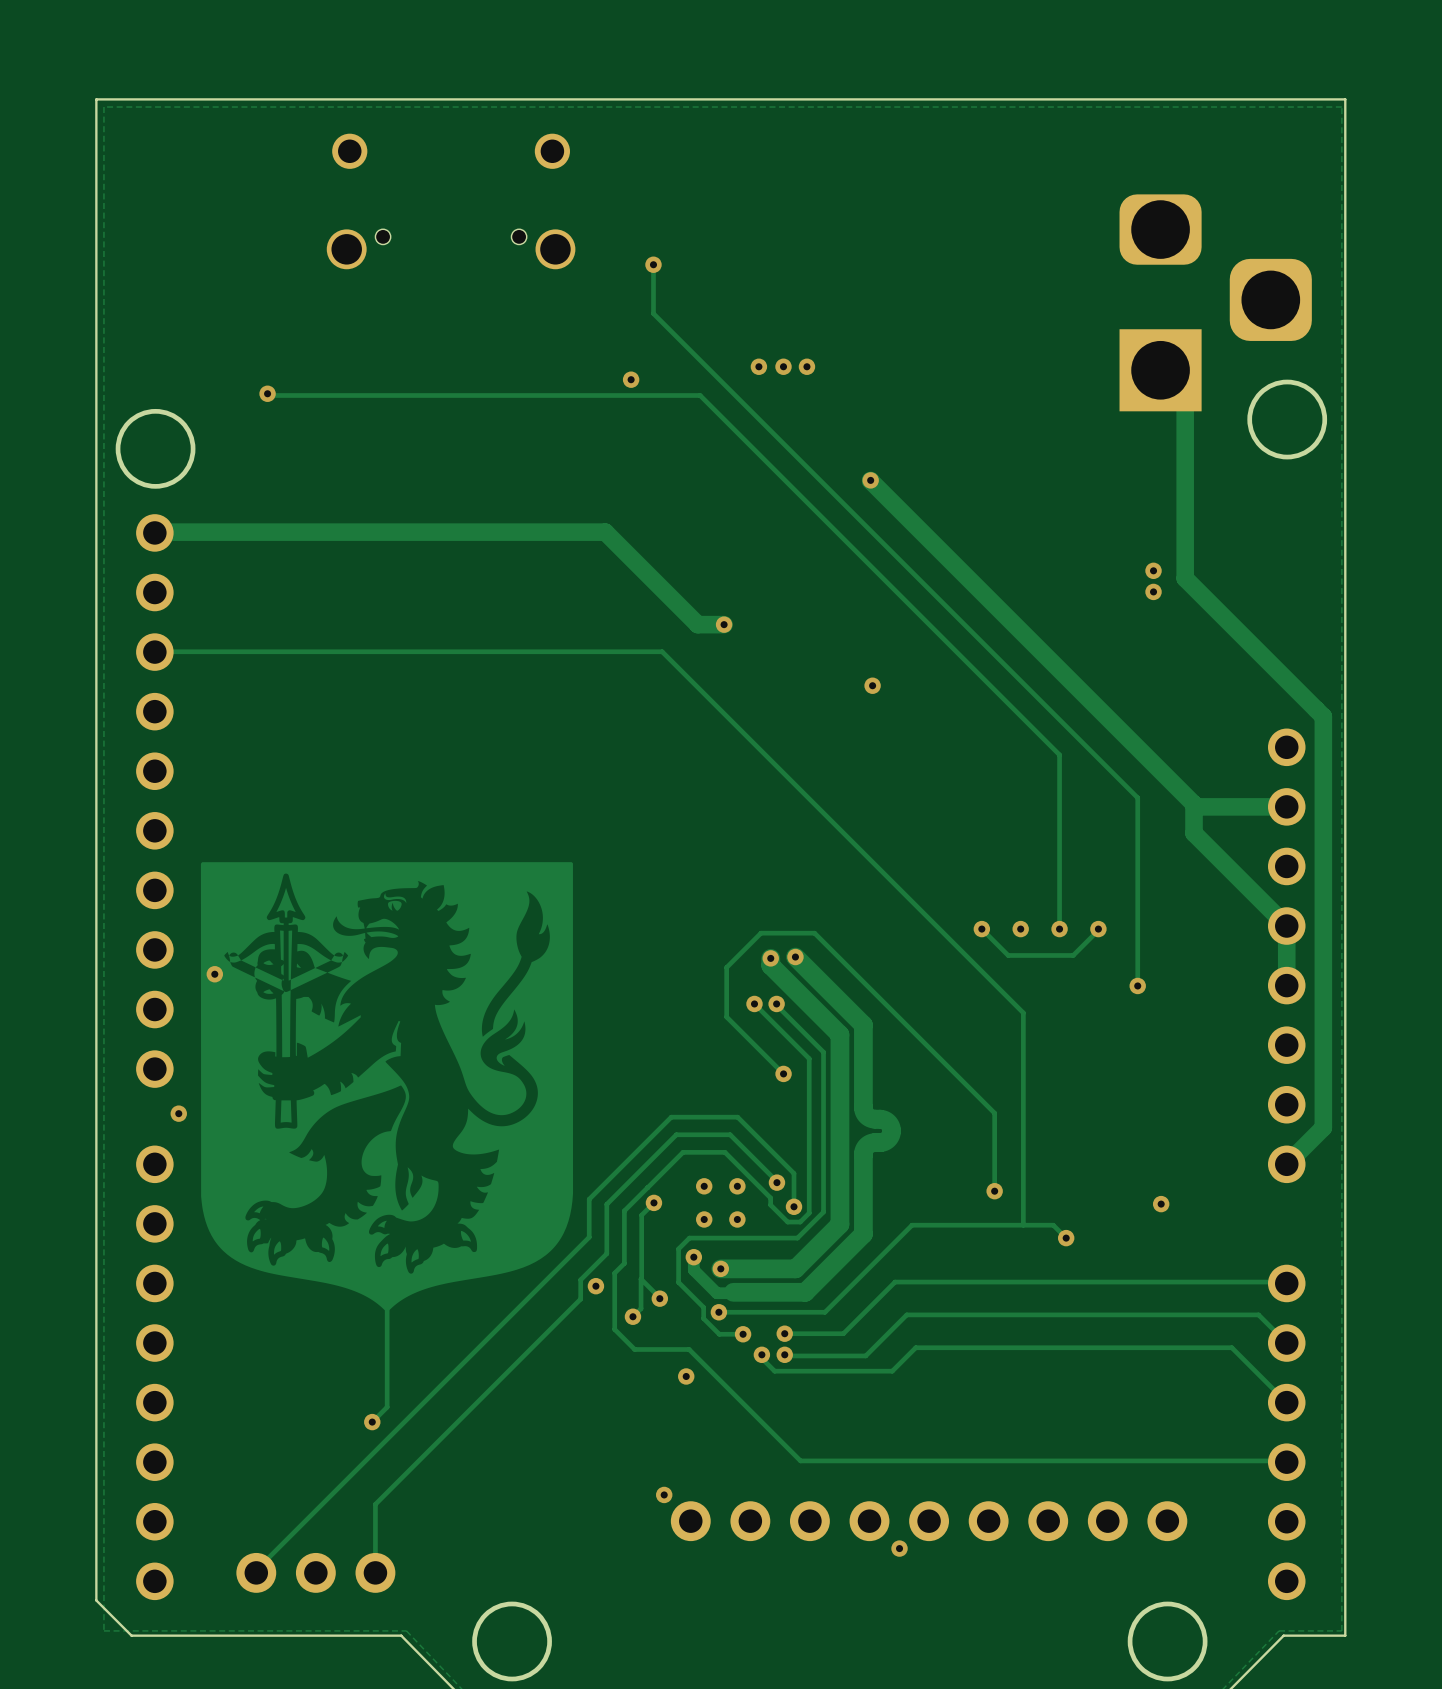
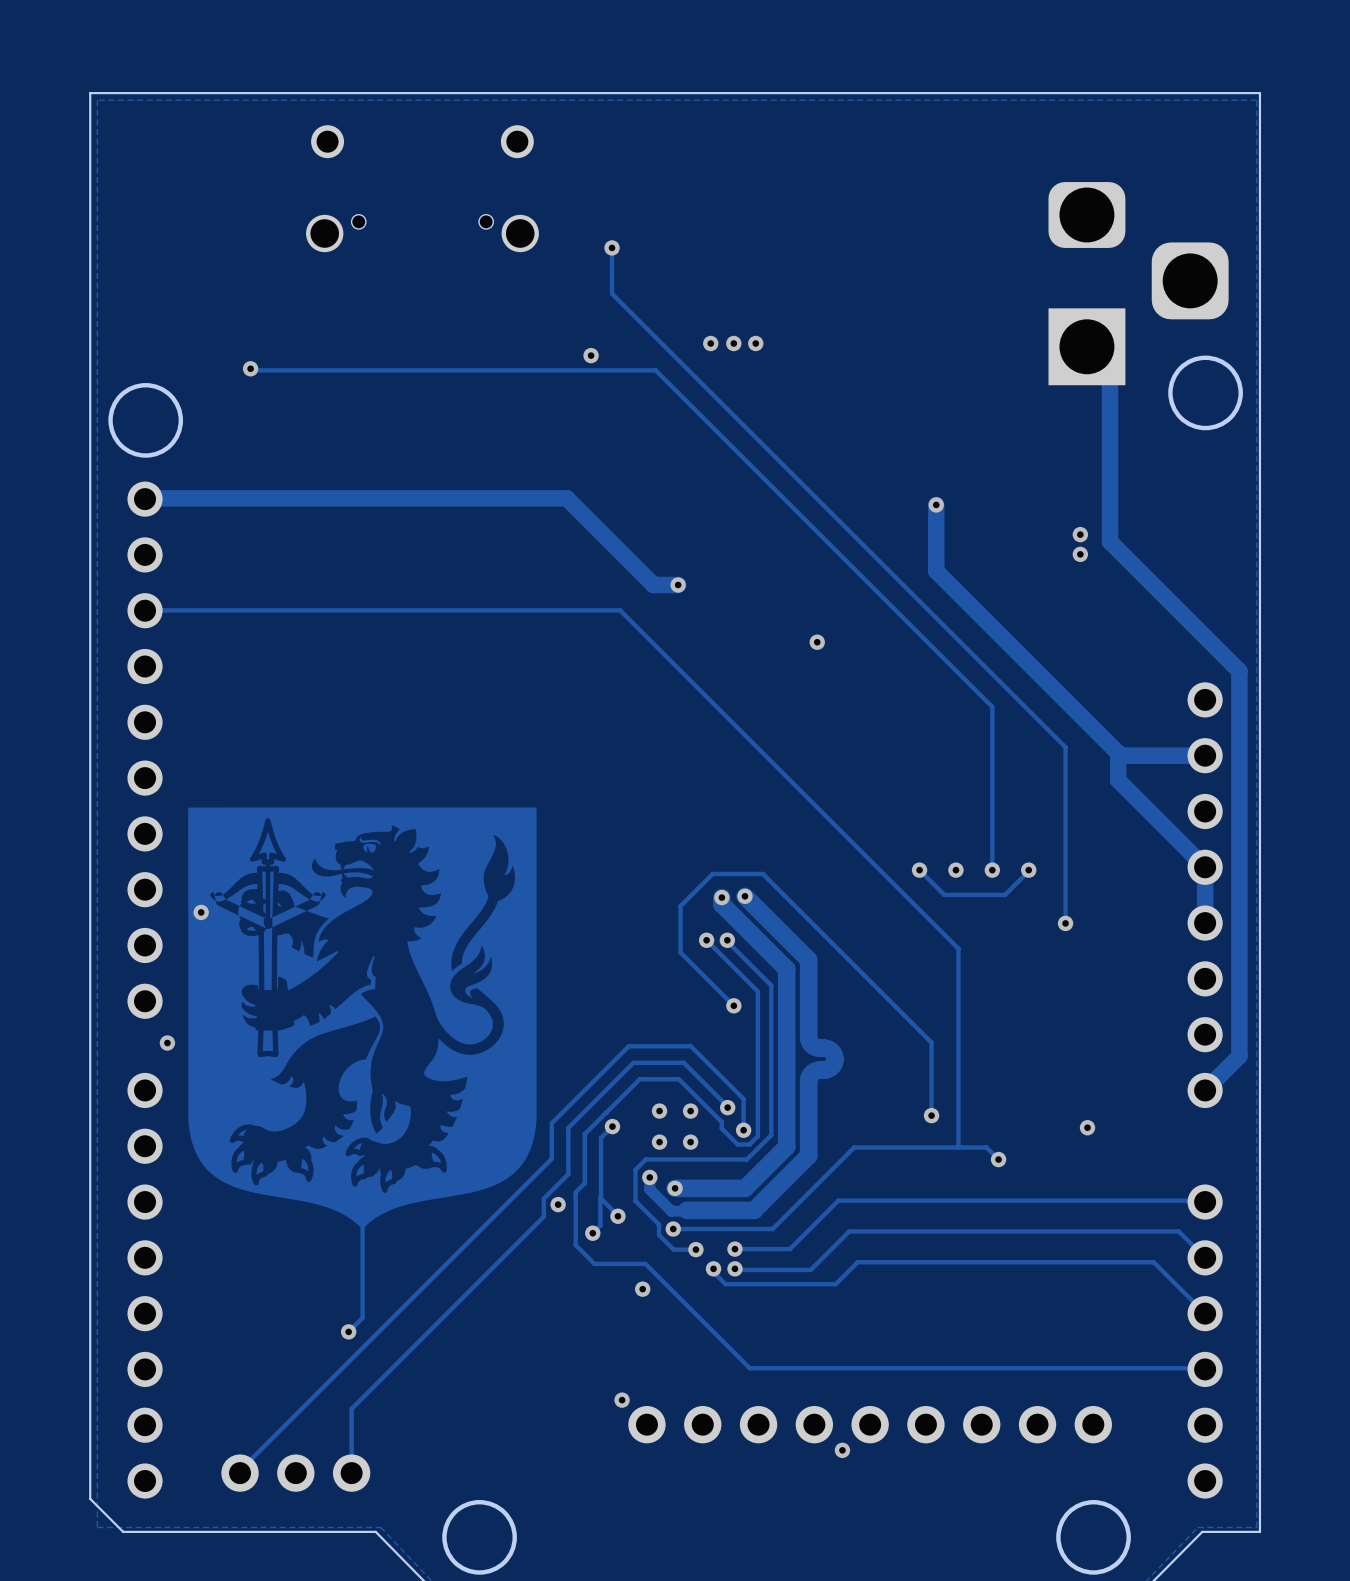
track: (870, 480) (999, 609) -> (936, 504) (936, 571)
via: (870, 480) -> none
via: none -> (936, 504)

